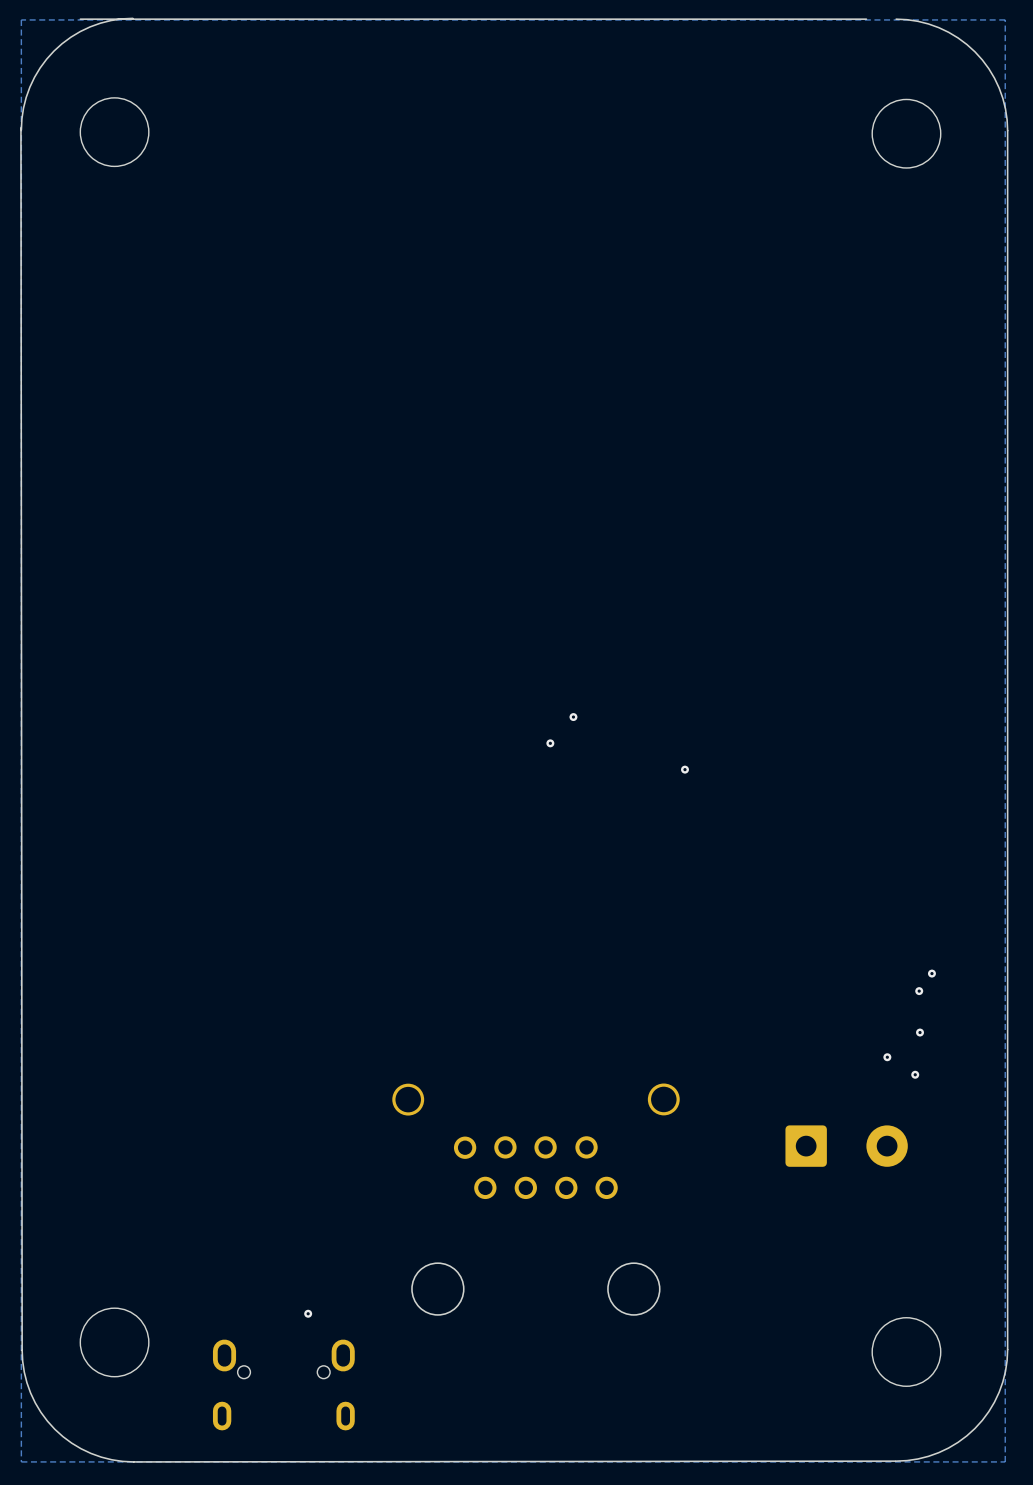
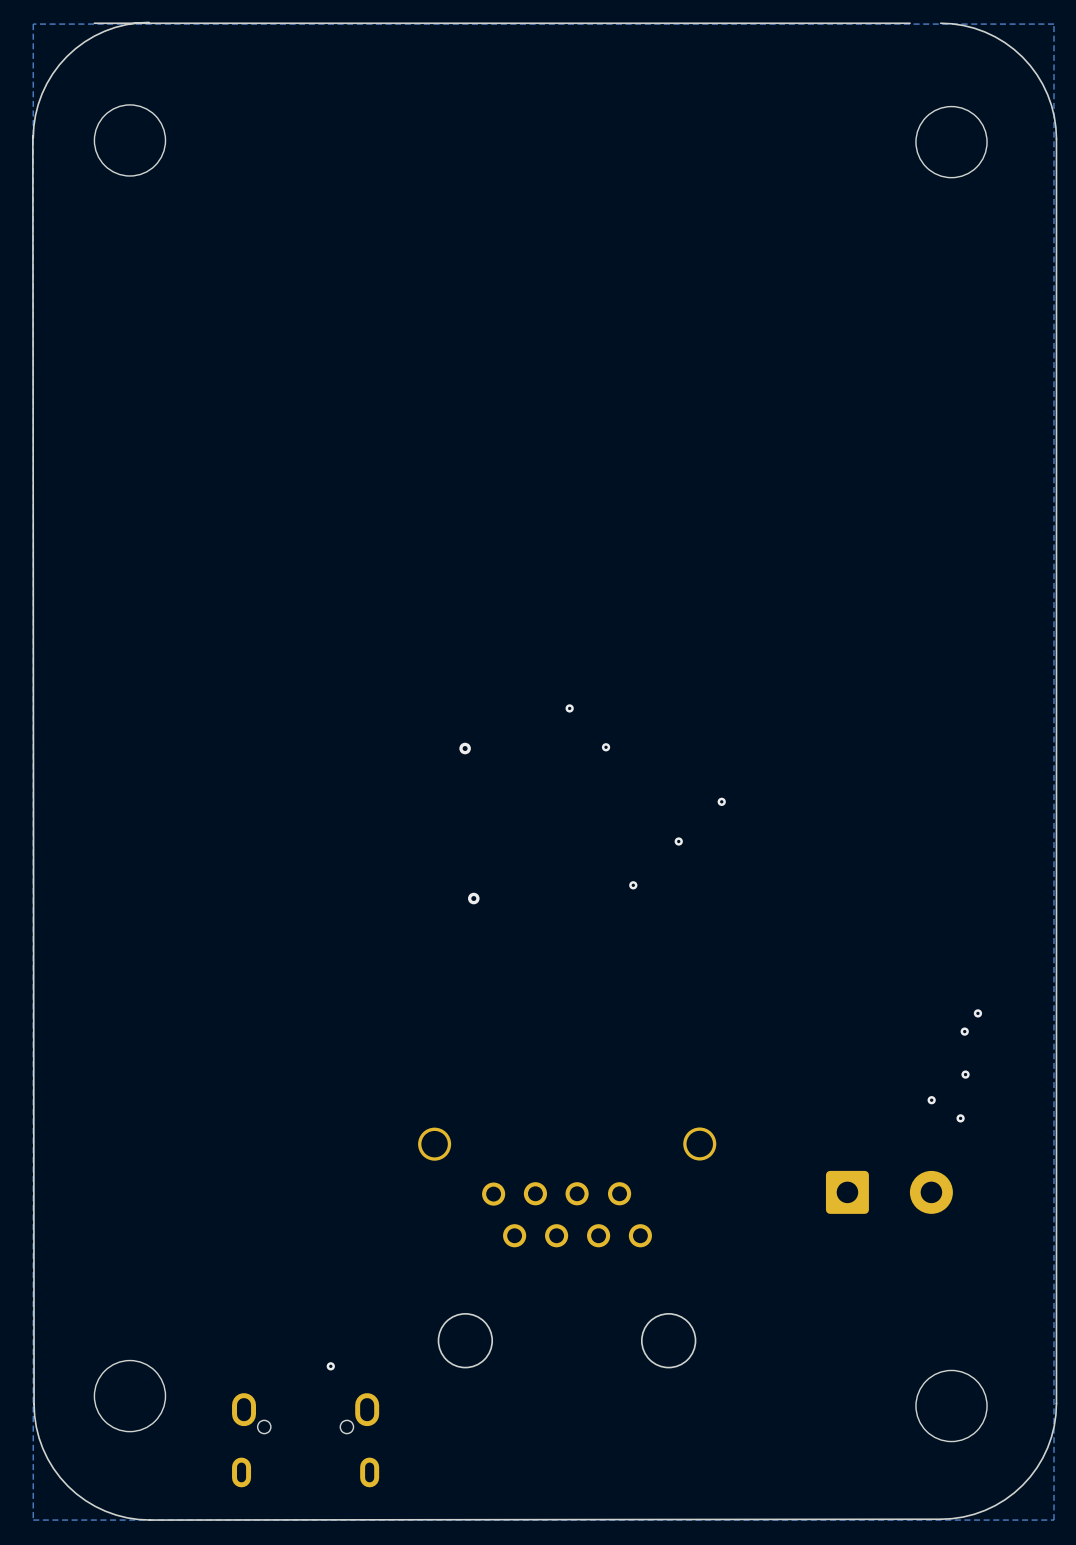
via: none -> (569, 708)
via: none -> (465, 748)
via: (550, 743) -> none
via: none -> (678, 841)
via: none -> (633, 885)
via: none -> (473, 898)

